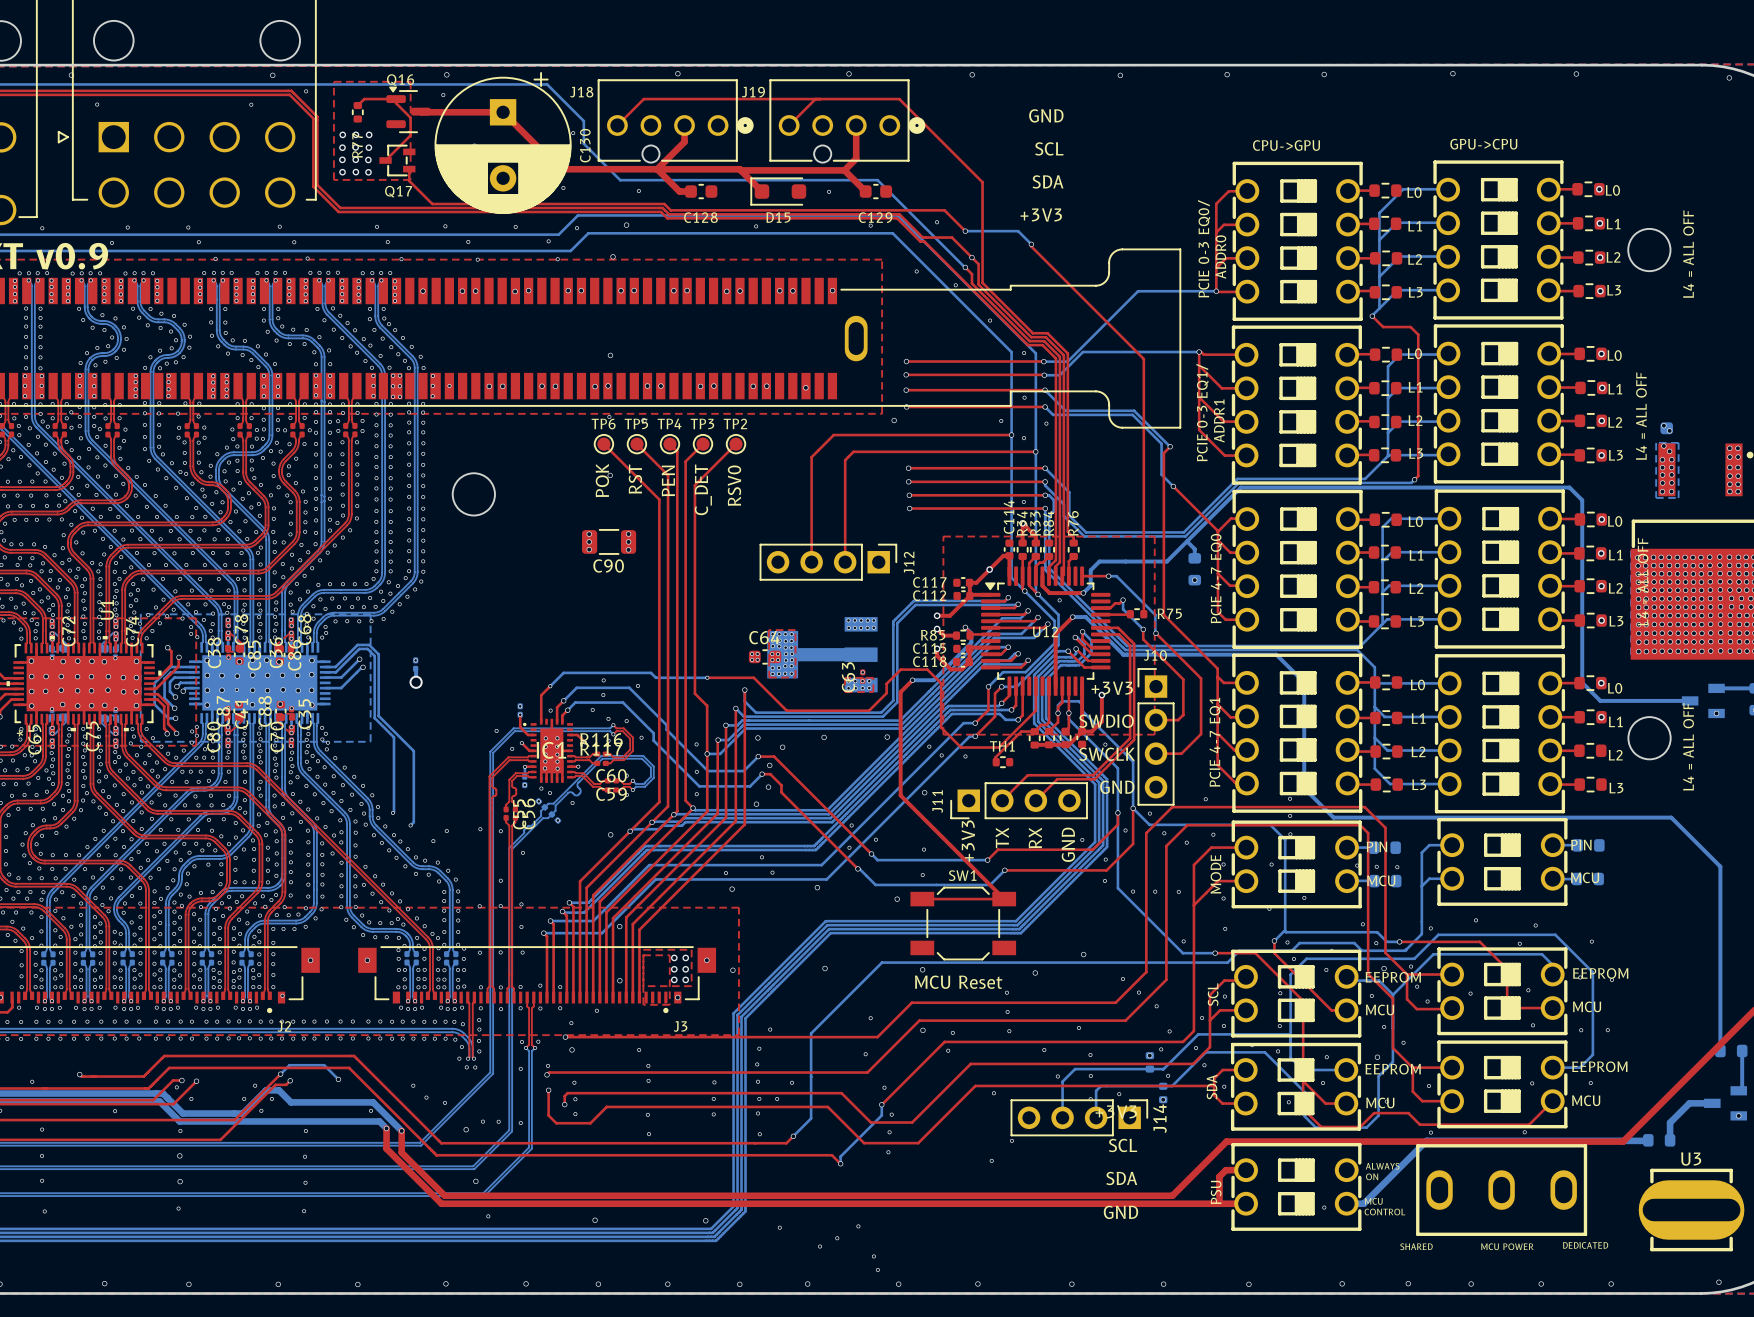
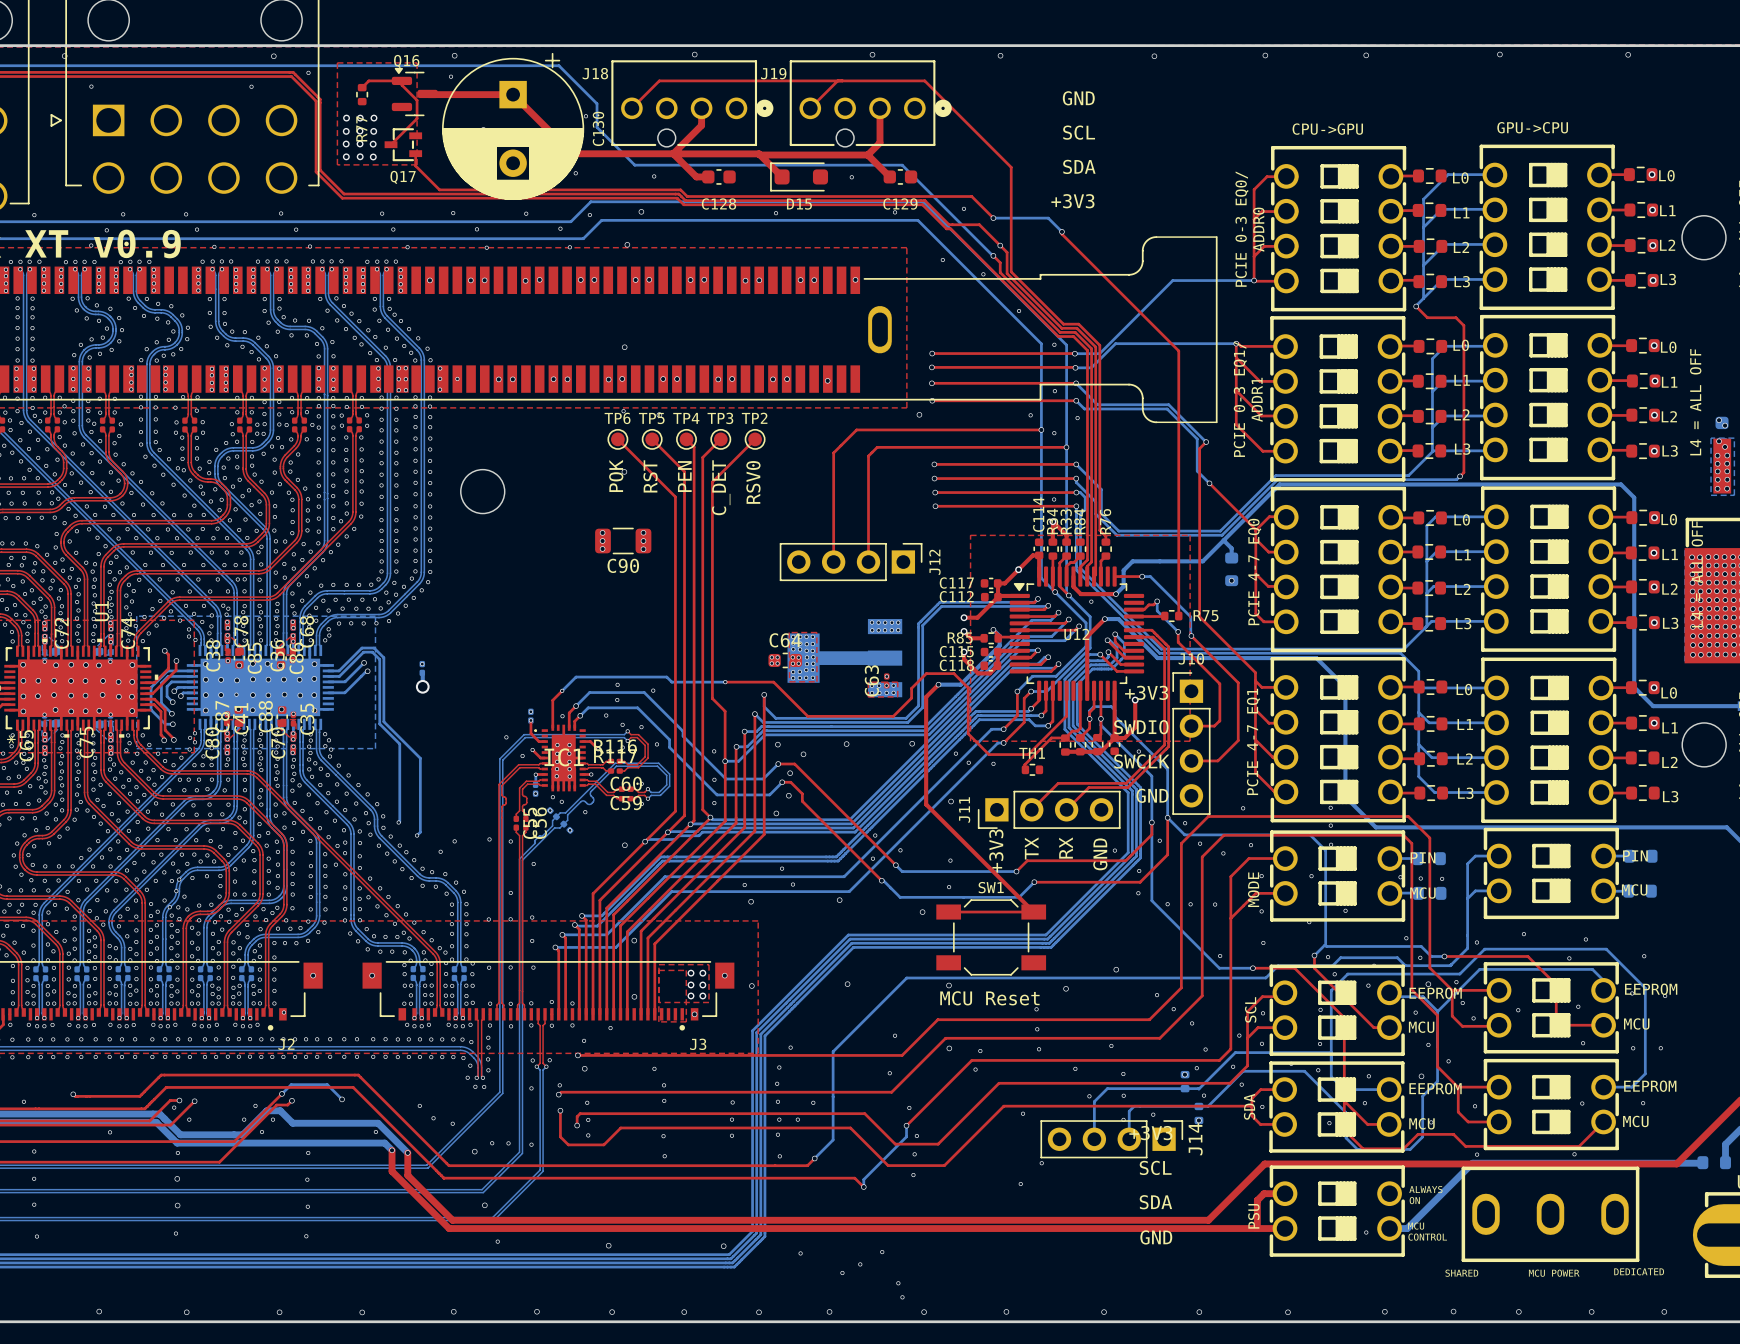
via: none -> (179, 879)
via: (187, 873) -> none
via: none -> (176, 891)
via: (173, 880) -> none
via: none -> (169, 907)

